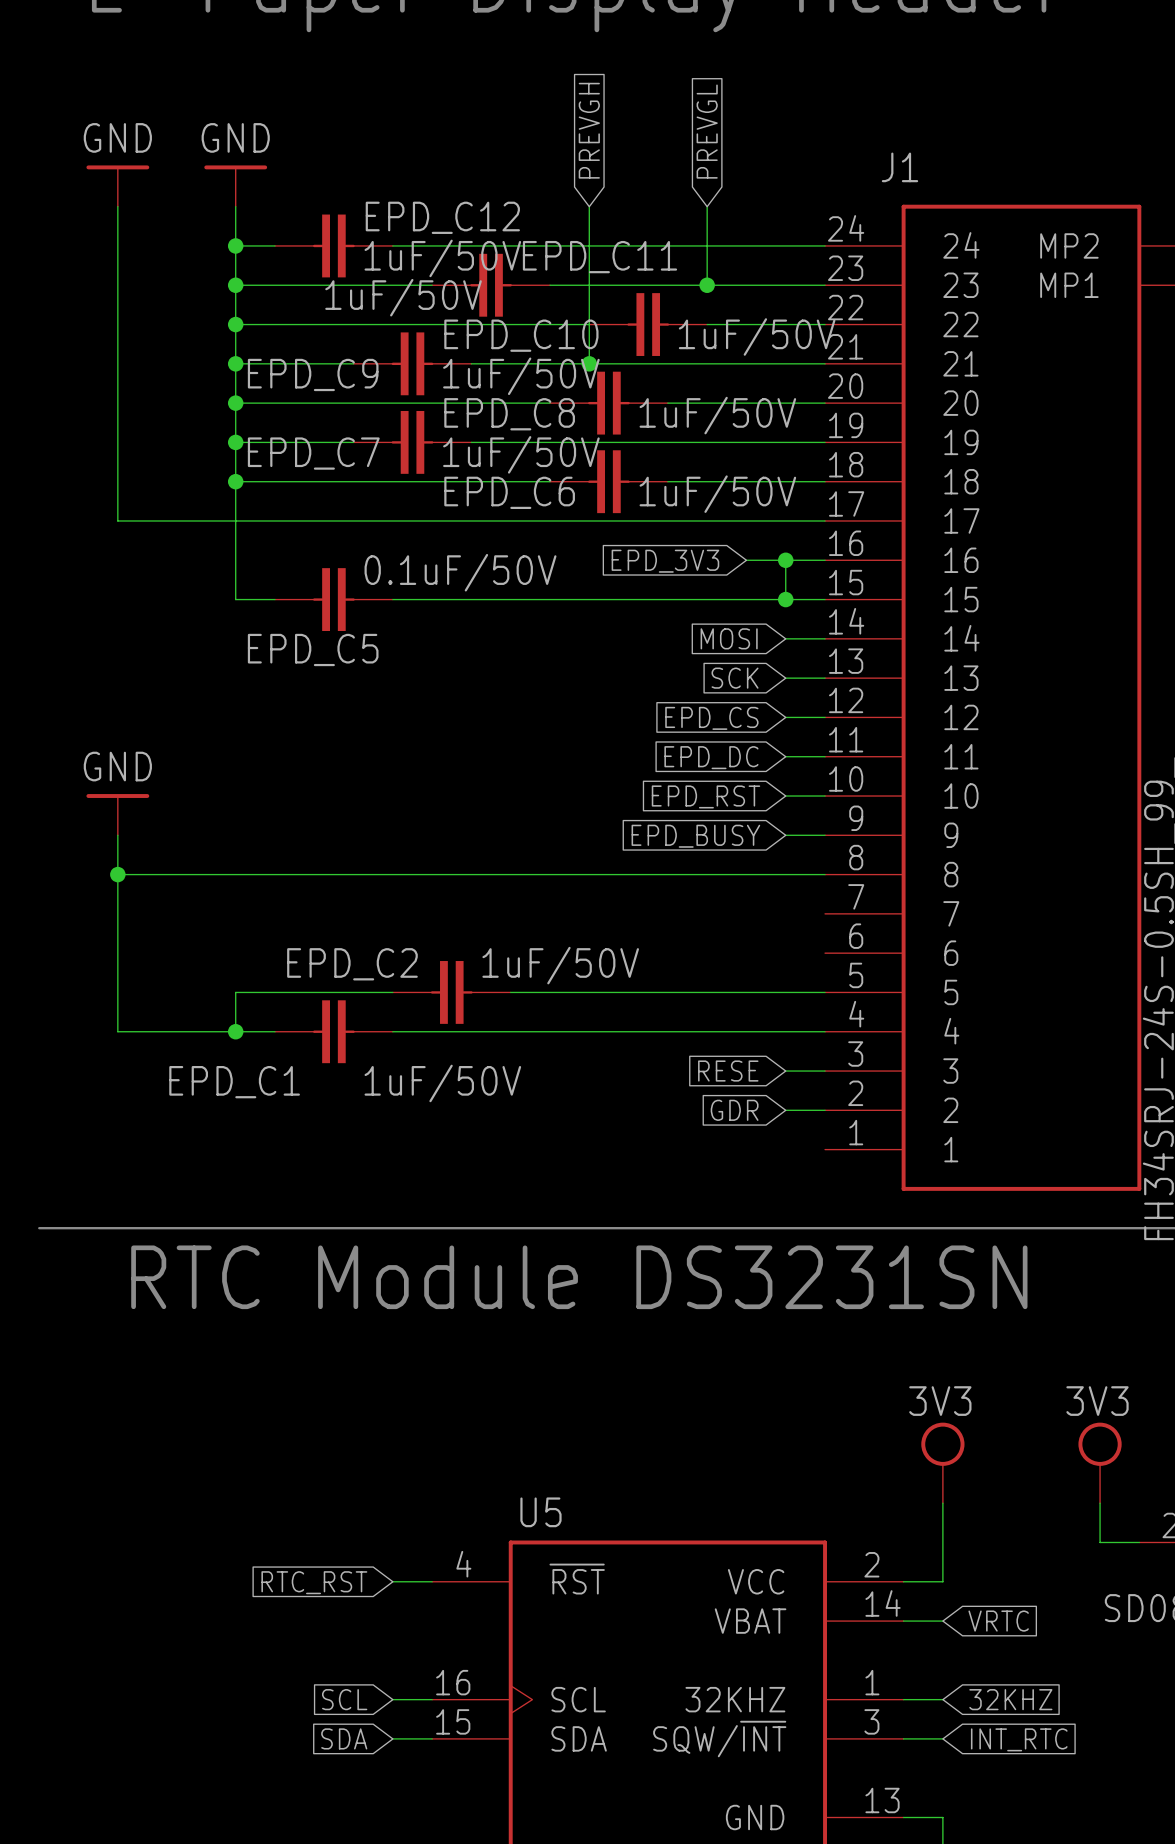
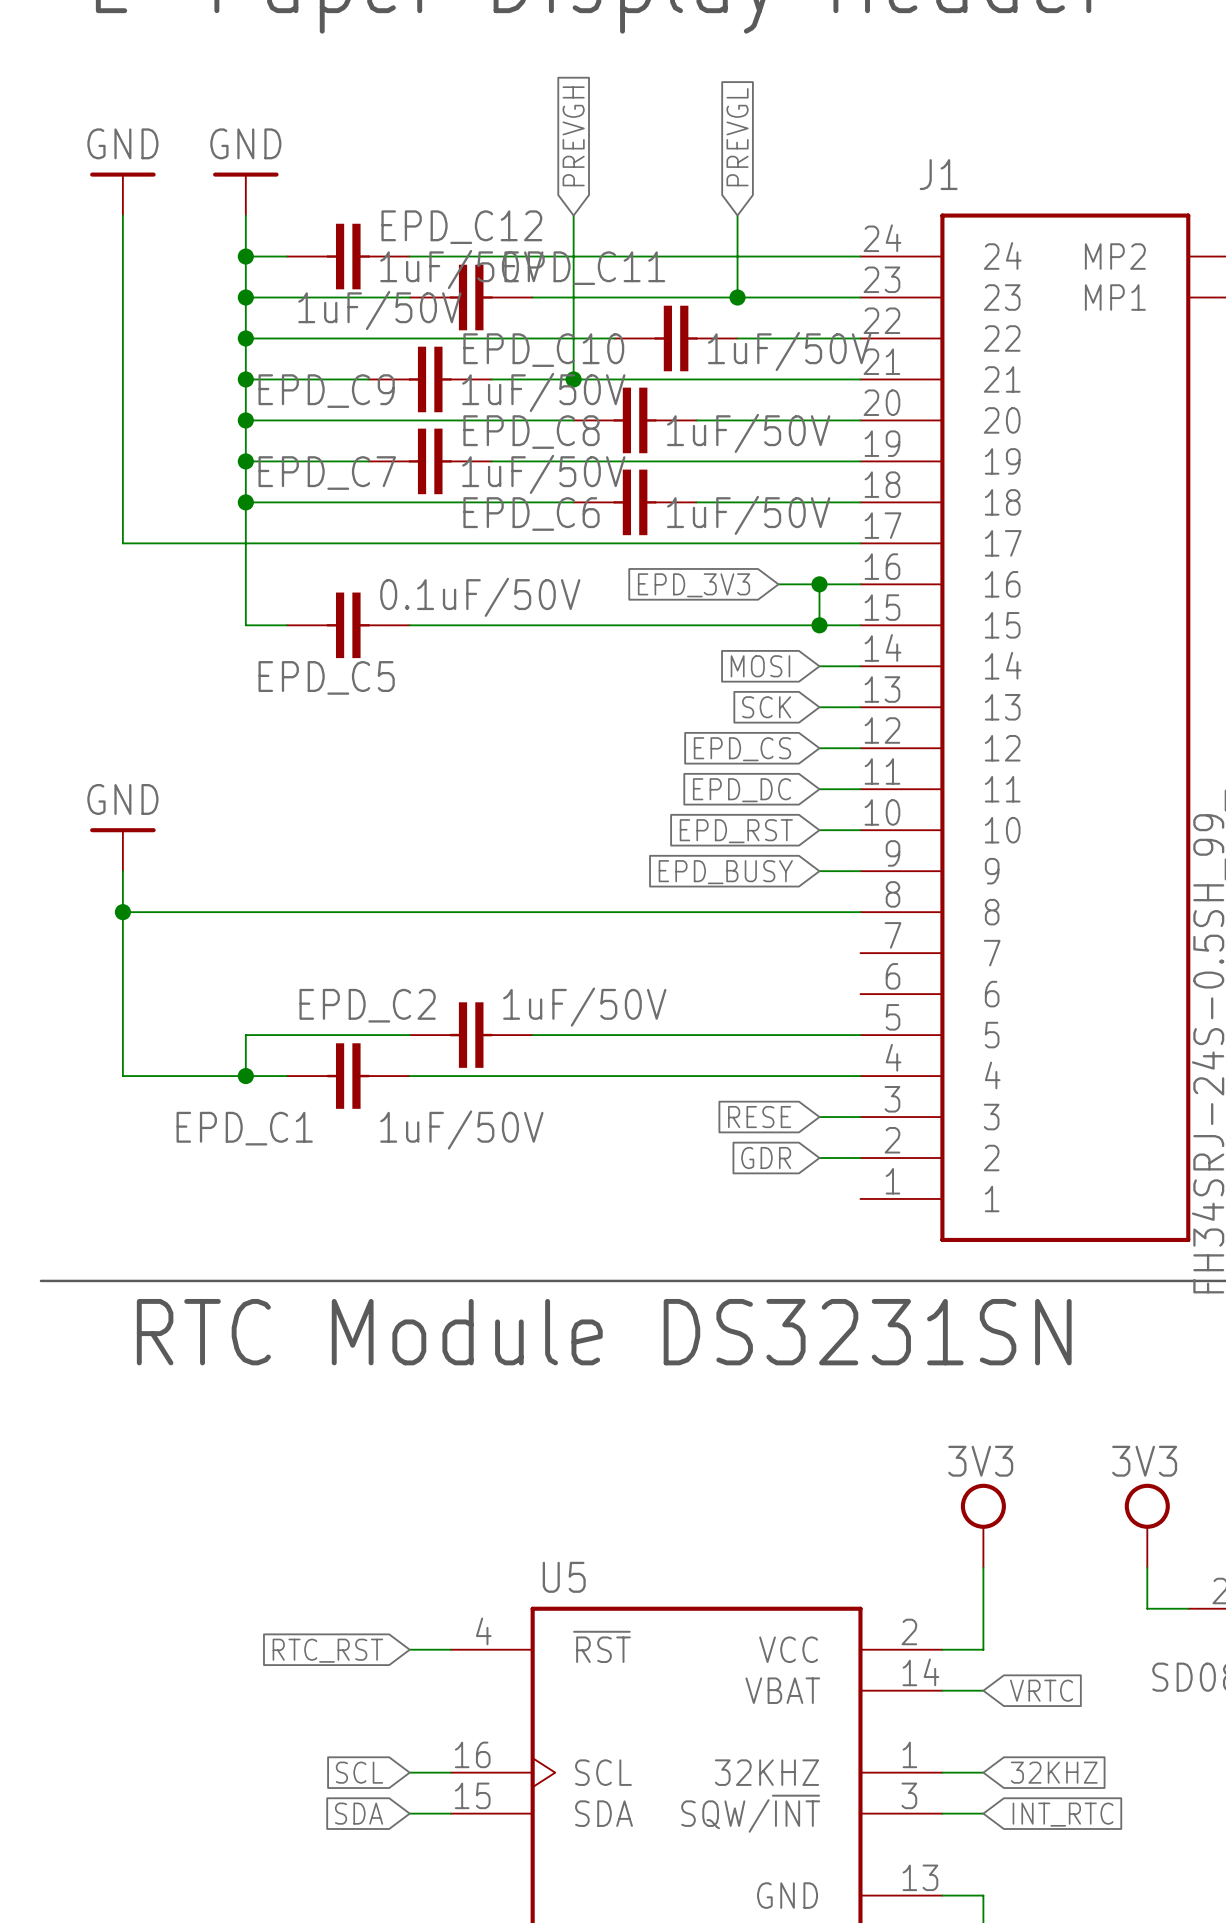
global label position: PREVGH (589, 130) -> PREVGH (573, 136)
wire: (589, 206) (589, 363) -> (573, 215) (573, 379)
EPD_C11 position: (491, 285) -> (471, 297)
junction position: (589, 363) -> (573, 379)

